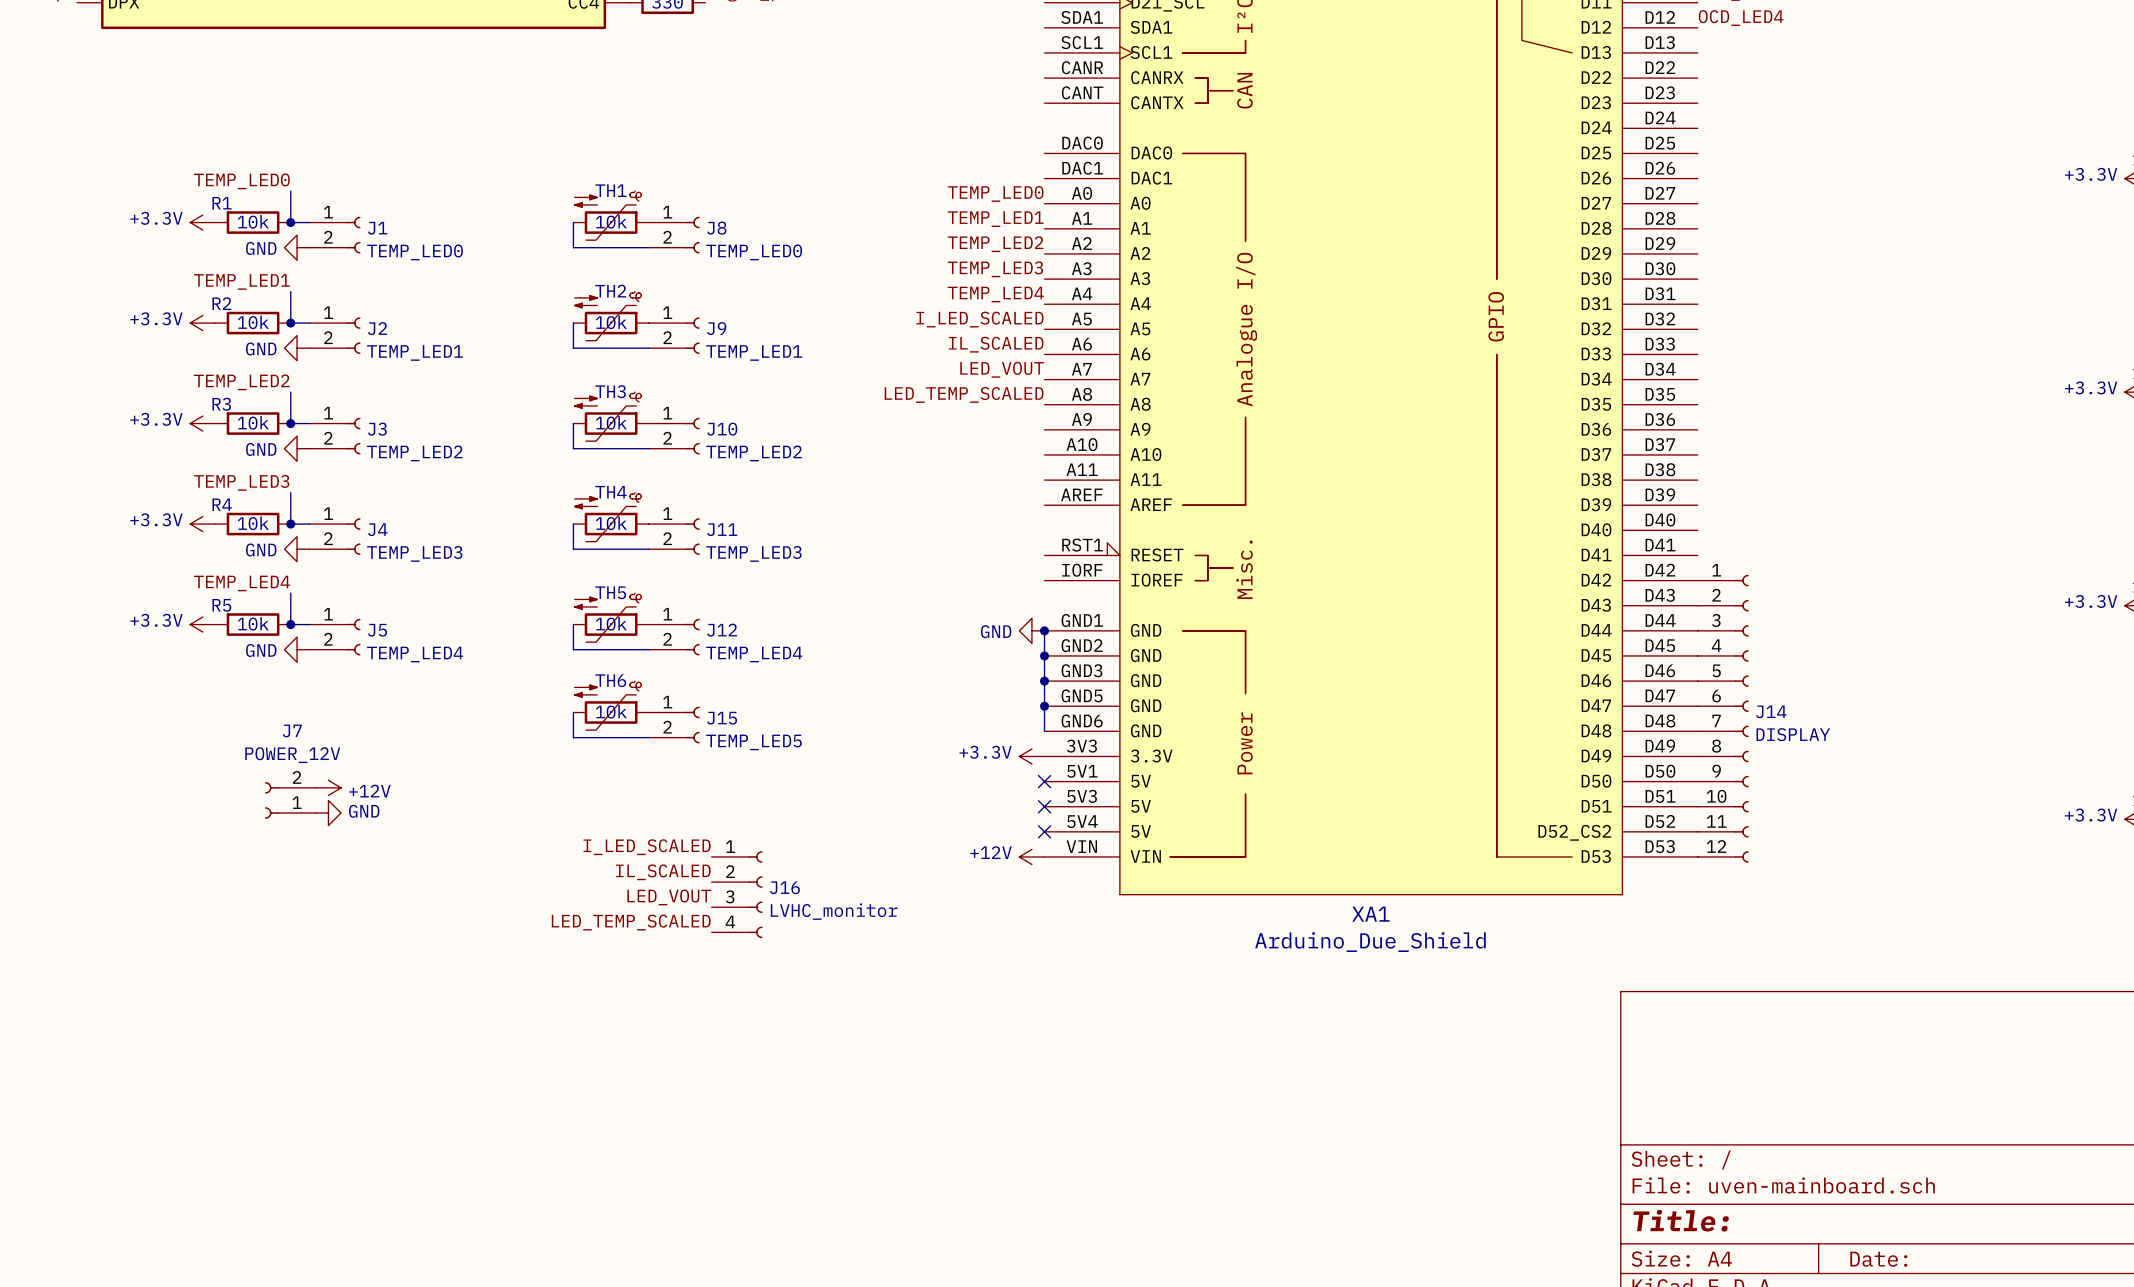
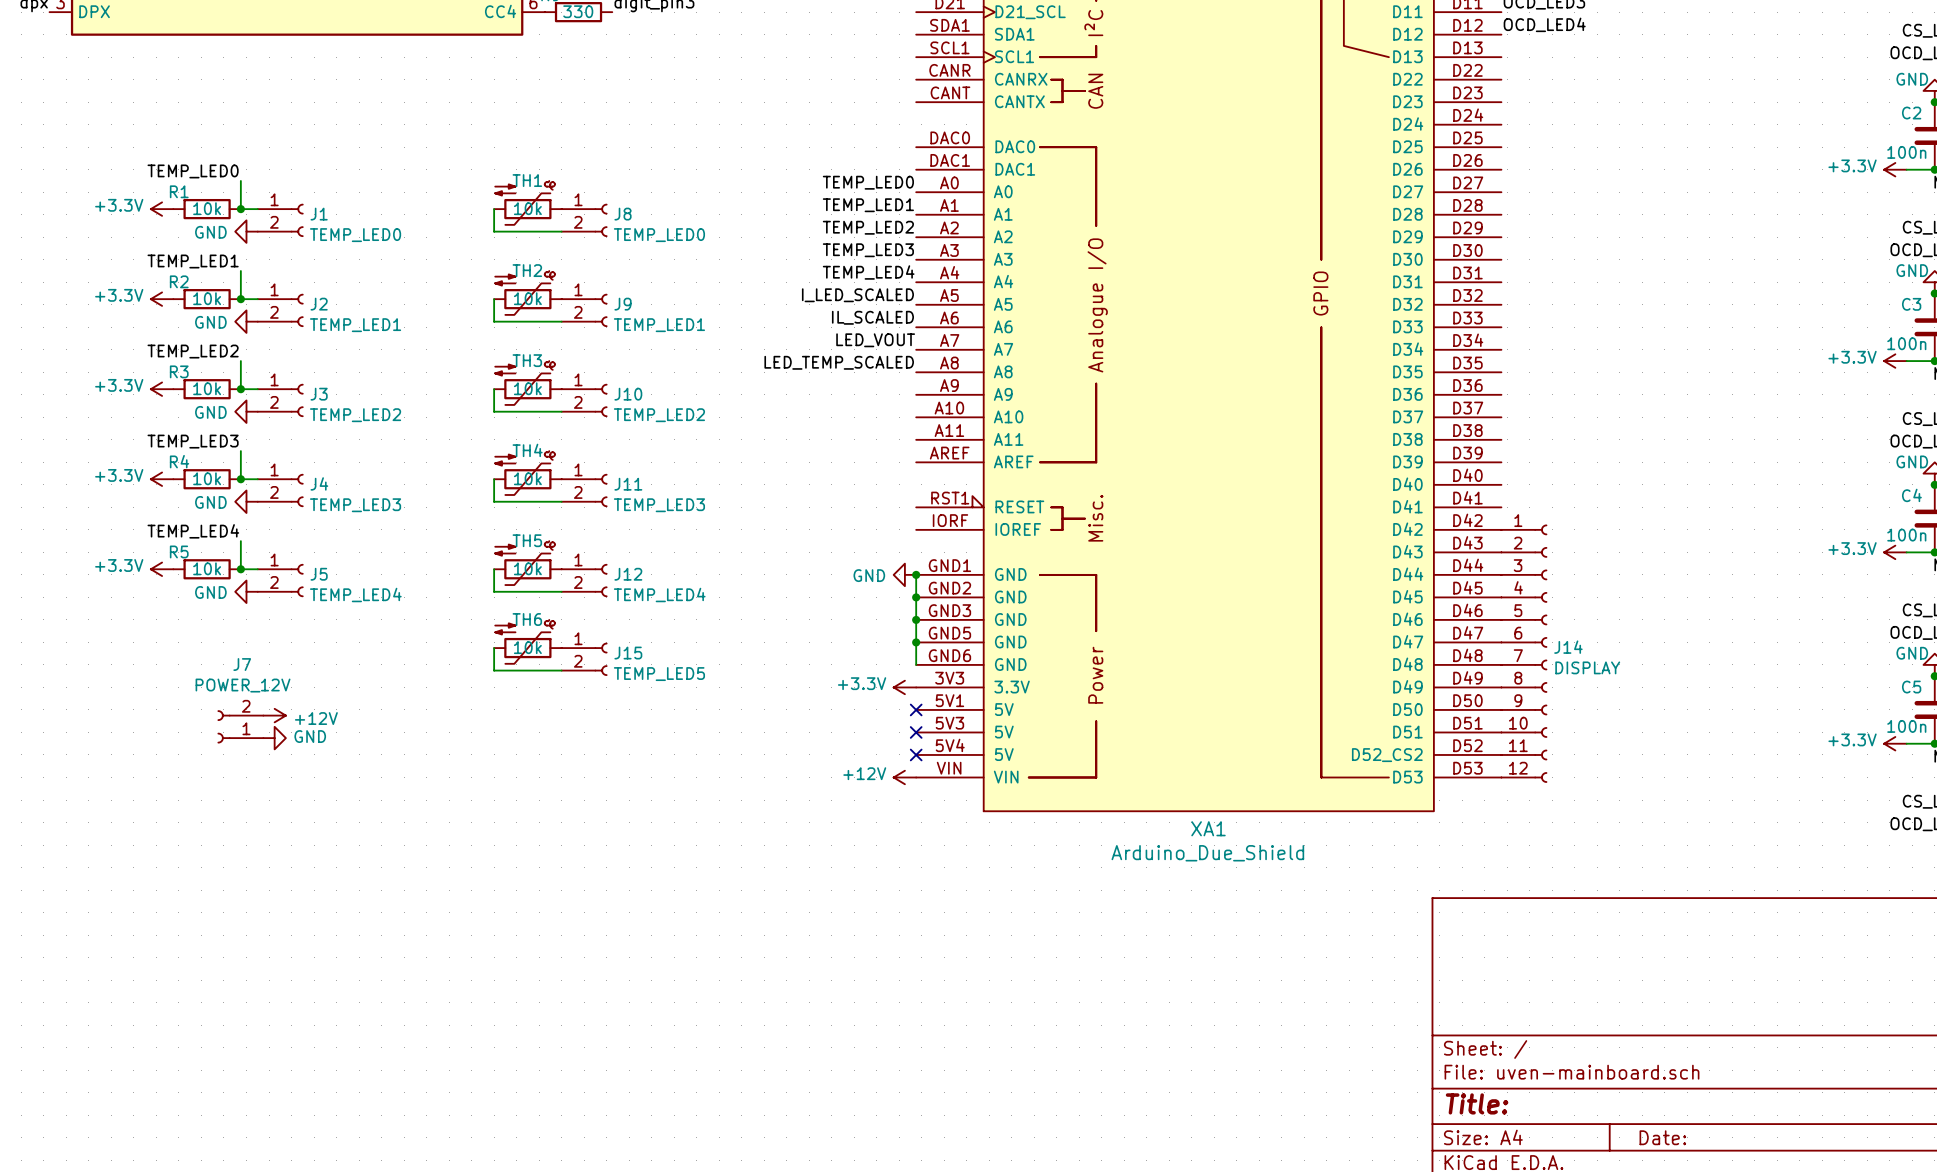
label: I_LED_SCALED (647, 847) -> none
label: IL_SCALED (663, 872) -> none
J16: LVHC_monitor (737, 894) -> none
label: LED_VOUT (669, 897) -> none
label: LED_TEMP_SCALED (631, 922) -> none

